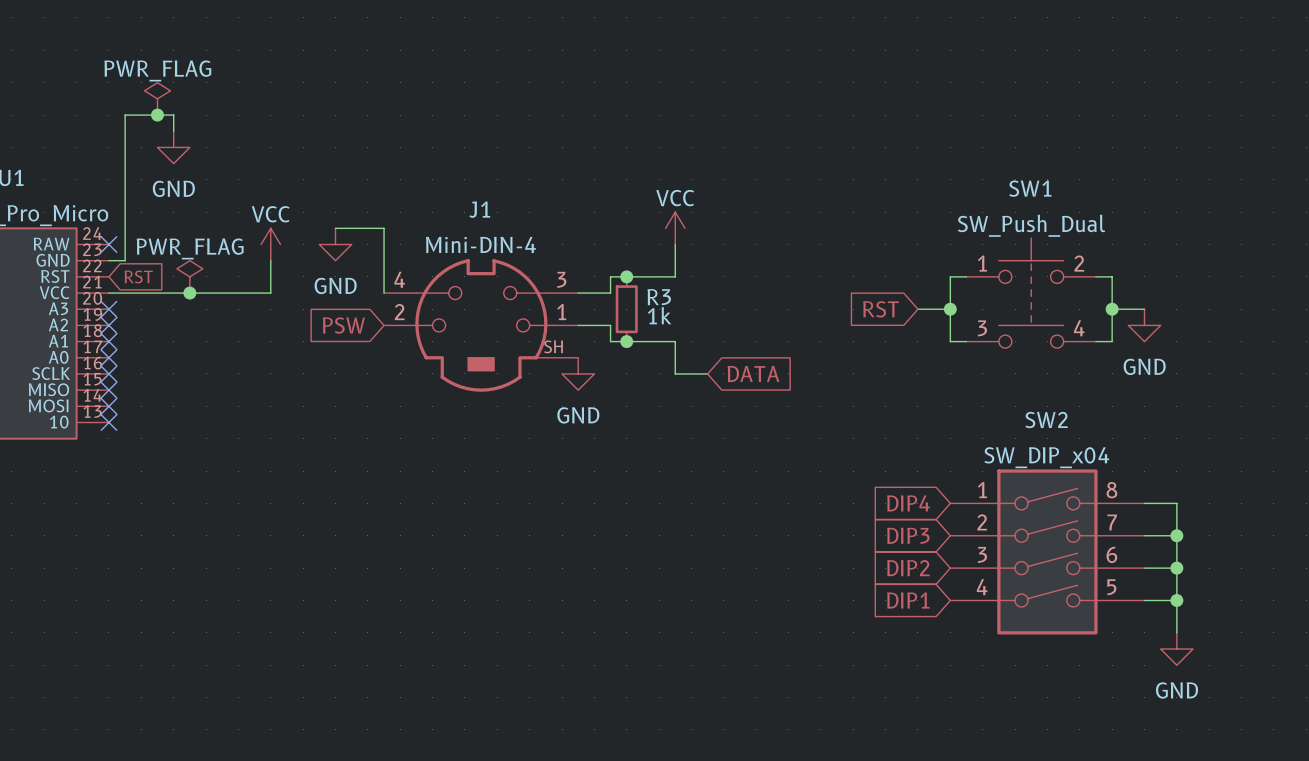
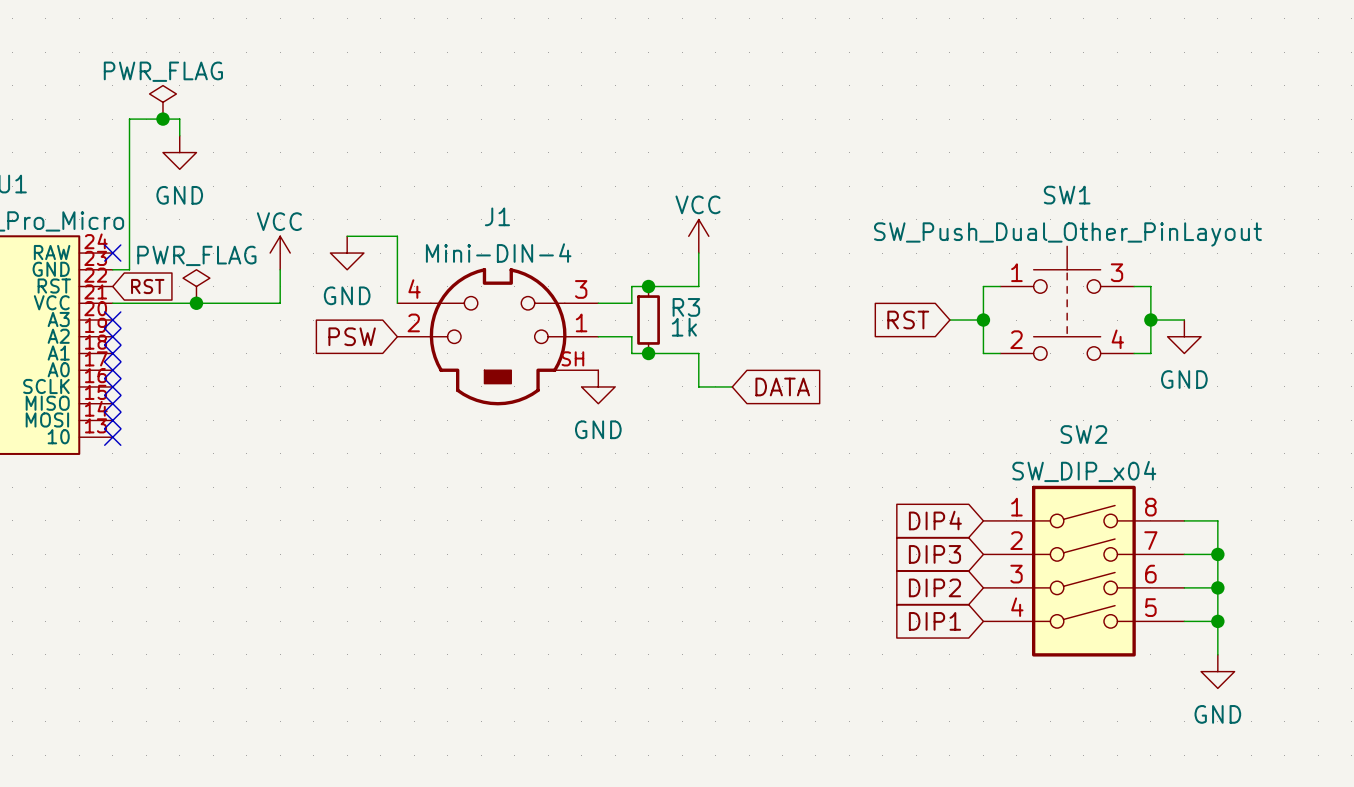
SW1 value: SW_Push_Dual (1031, 225) -> SW_Push_Dual_Other_PinLayout (1067, 234)
SW1 pin number: 2 (1079, 263) -> 3 (1116, 272)
SW1 pin number: 3 (982, 328) -> 2 (1016, 339)

